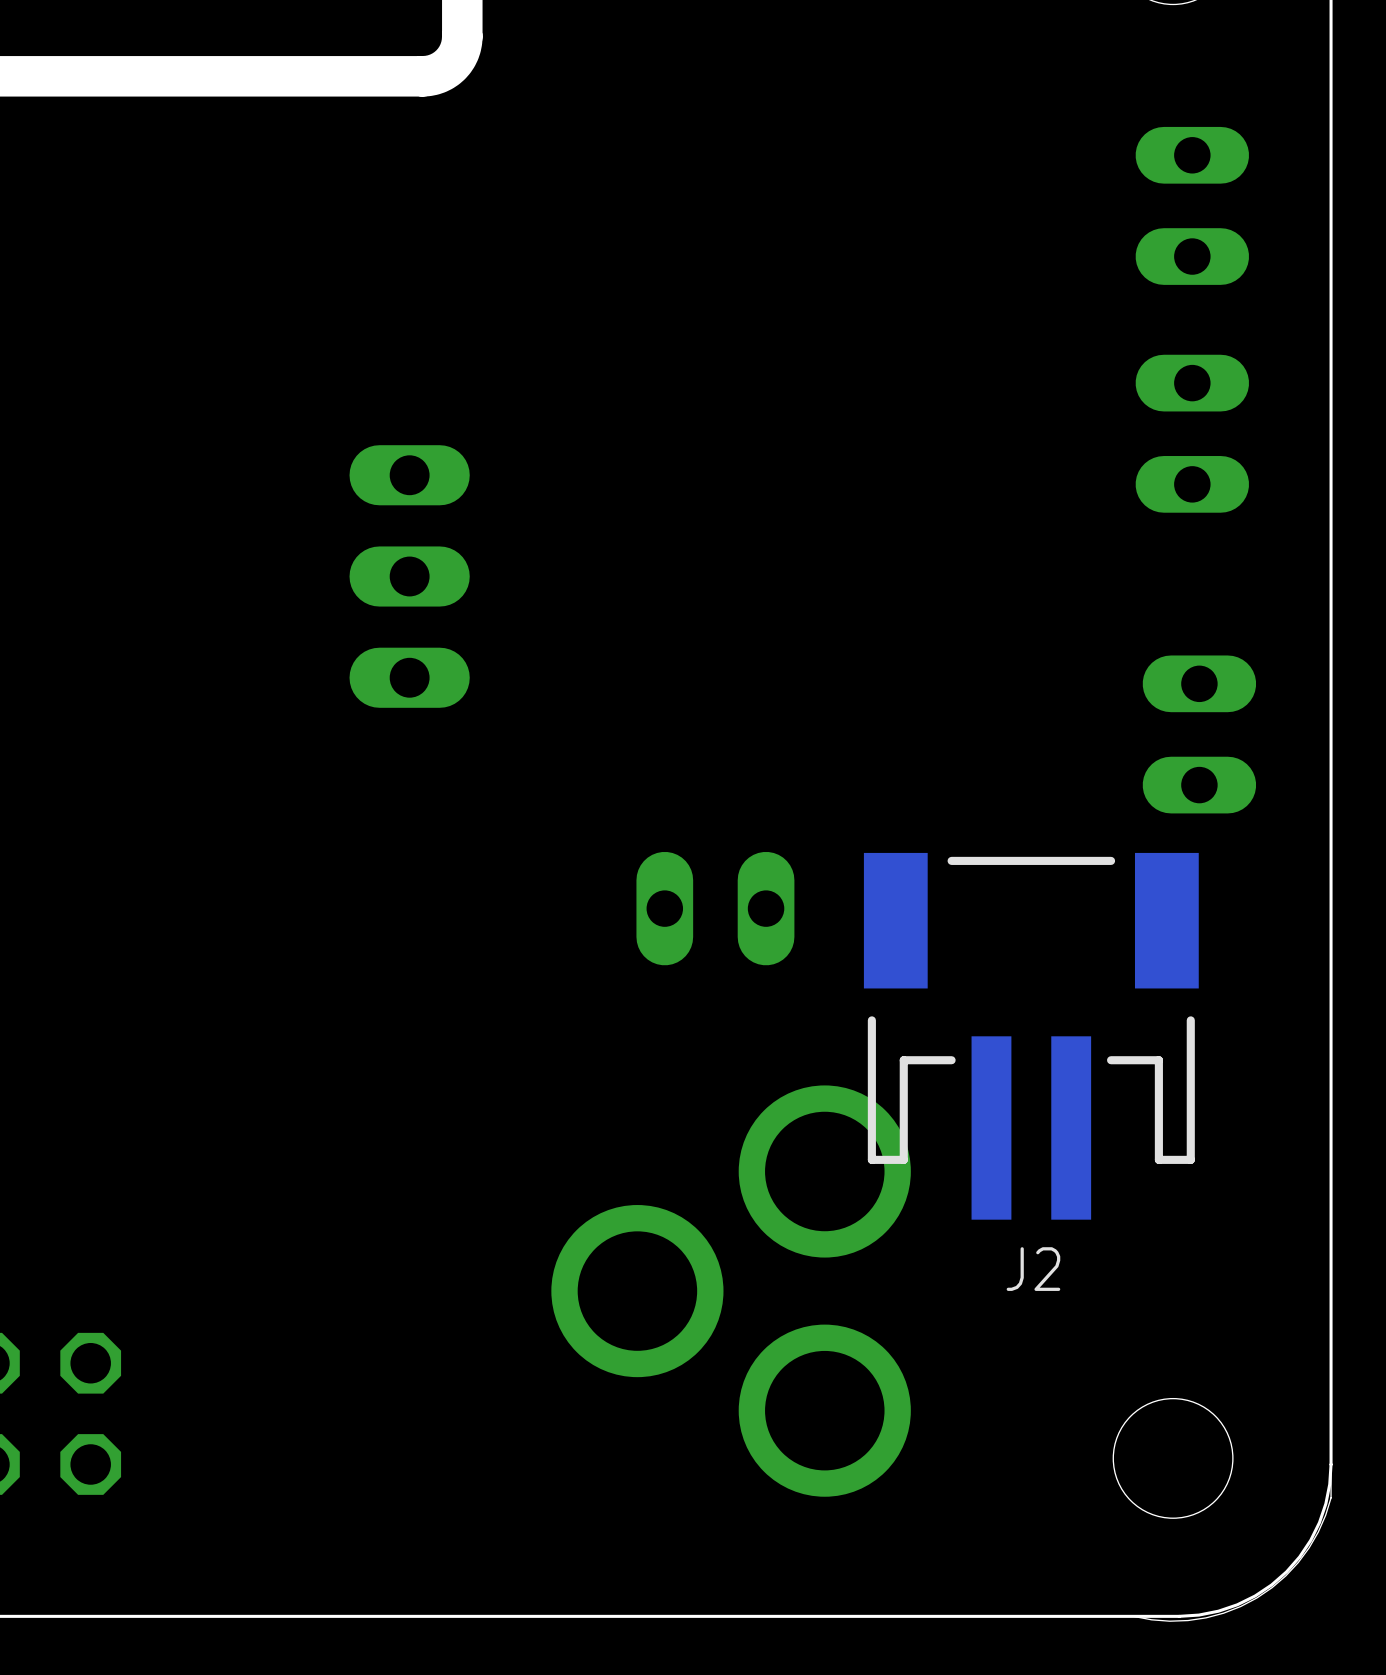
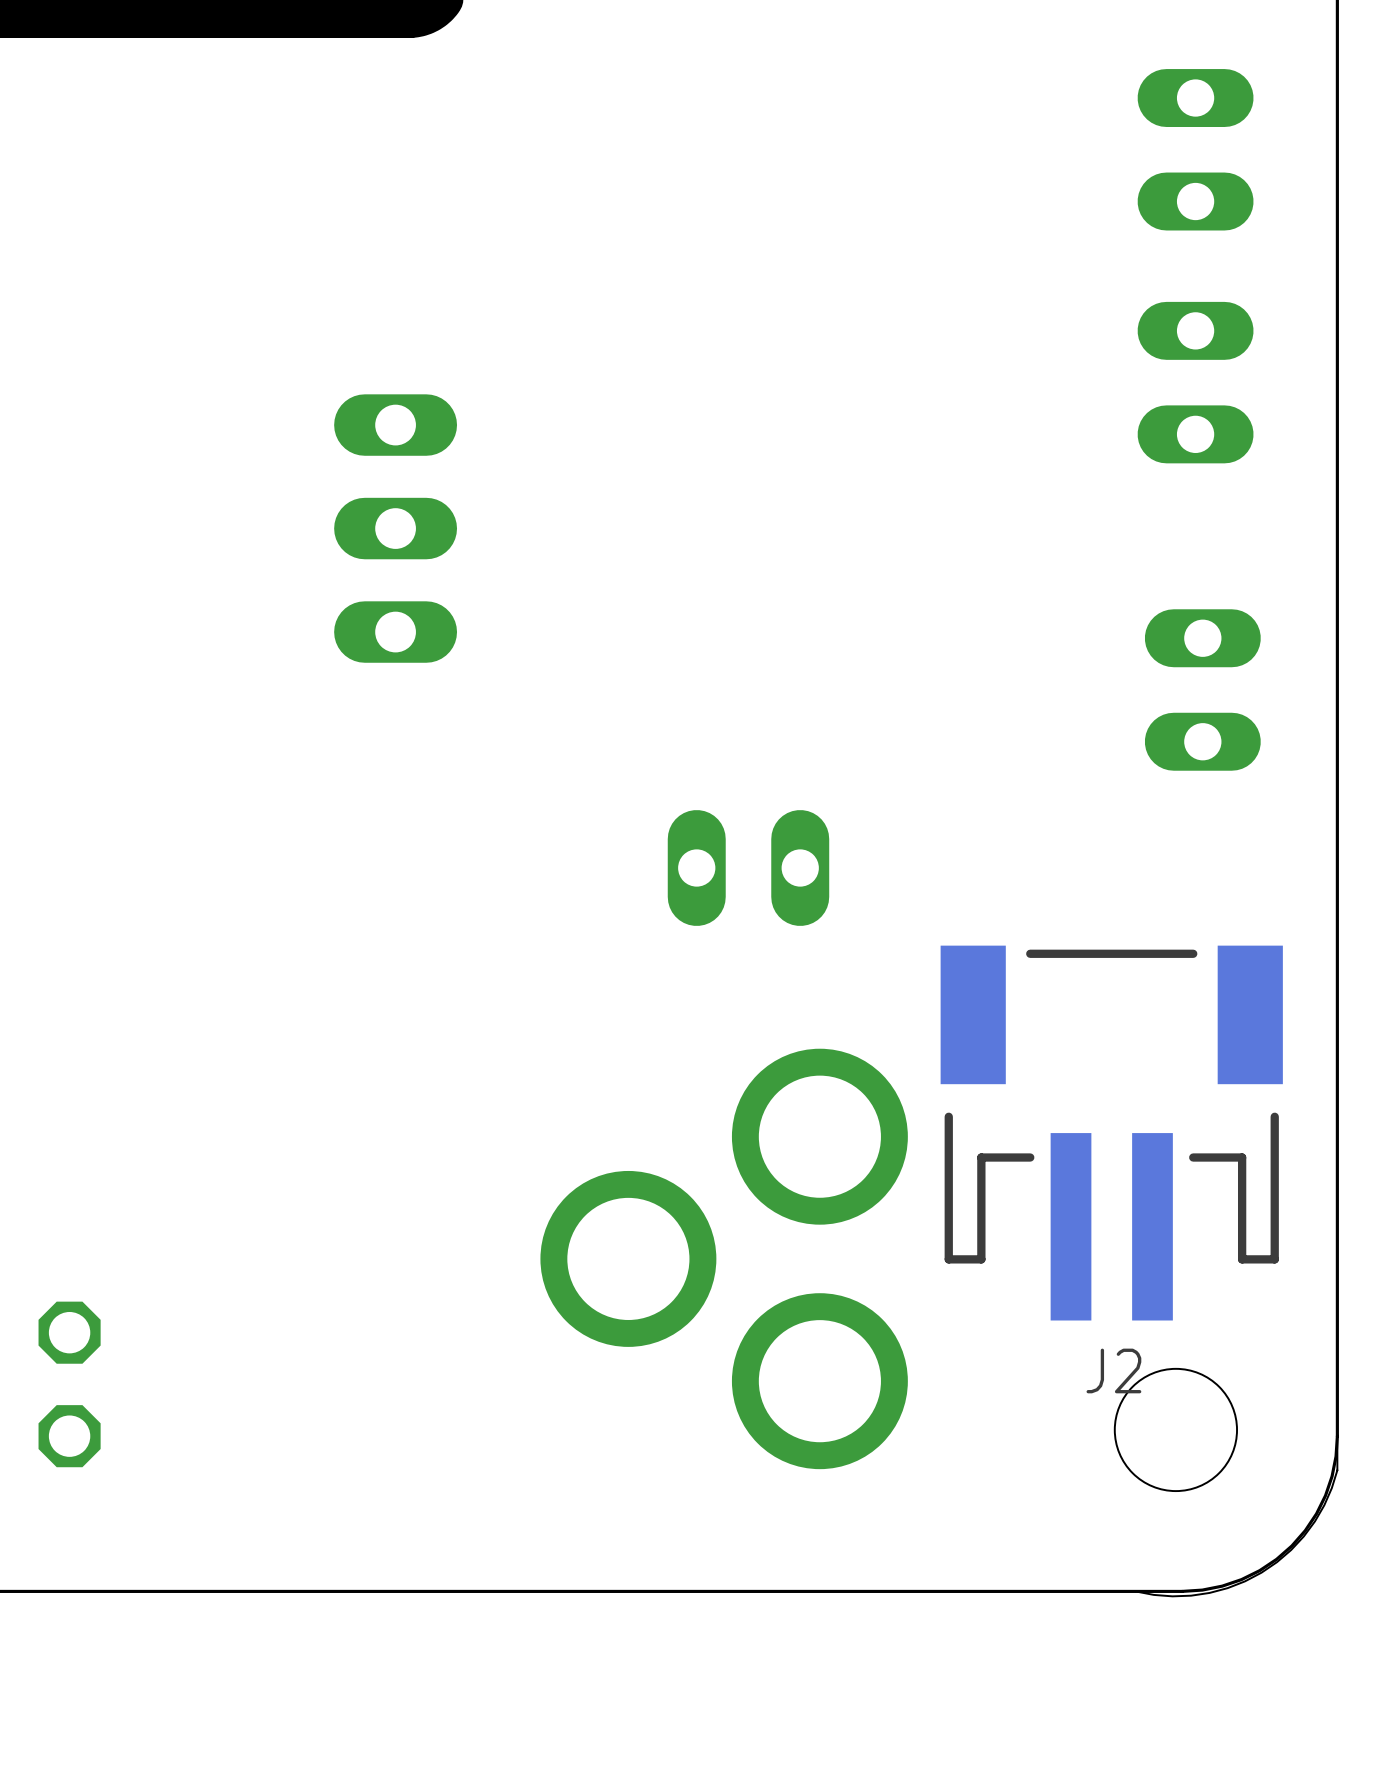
part position: (715, 908) -> (748, 868)
J2 position: (1031, 1036) -> (1111, 1133)

